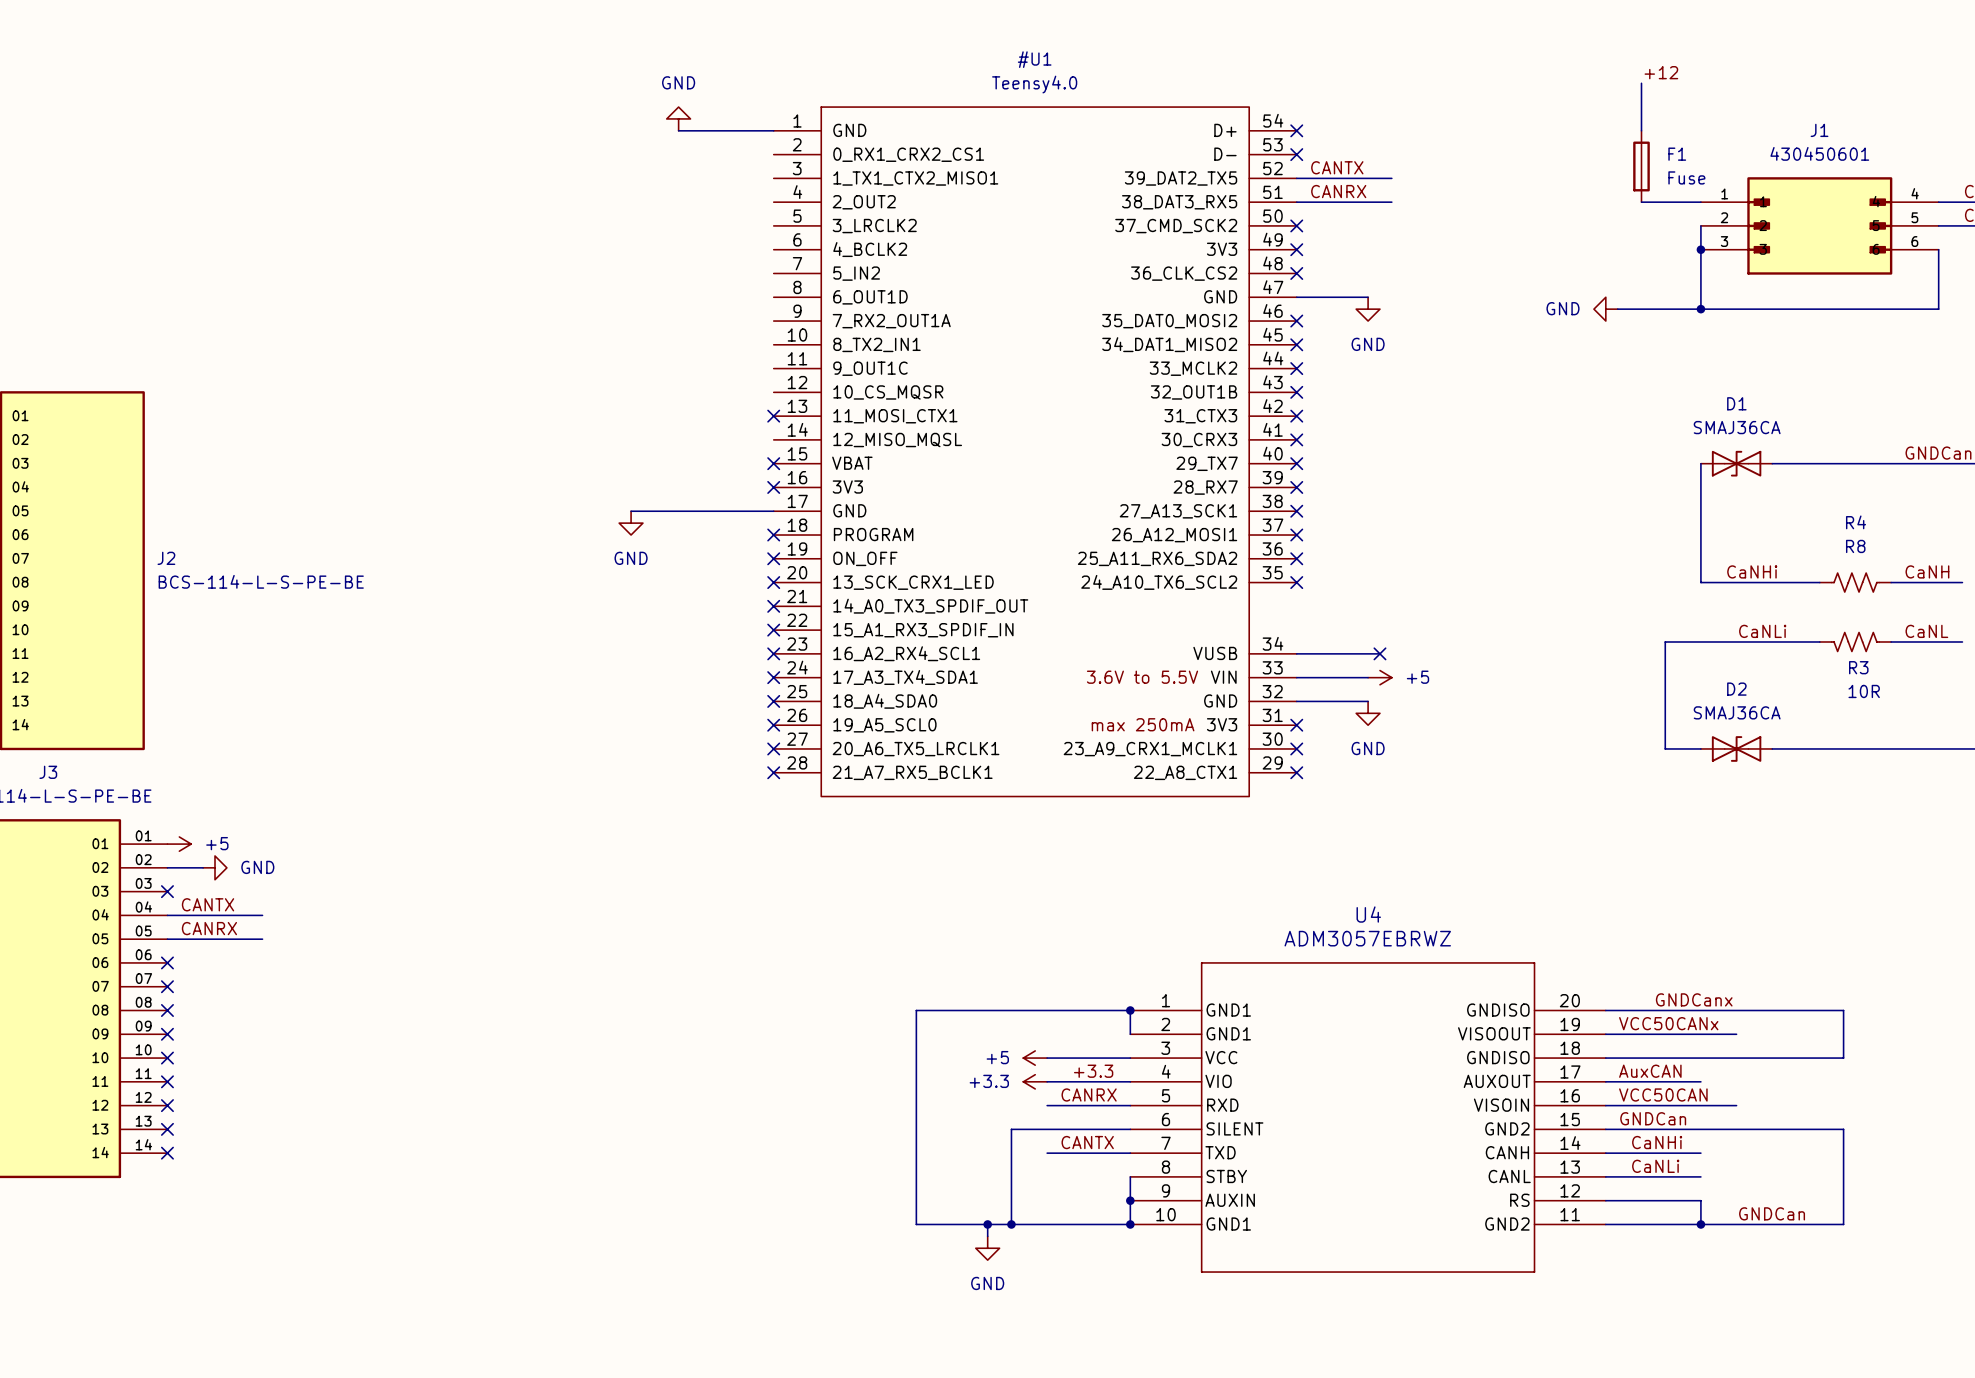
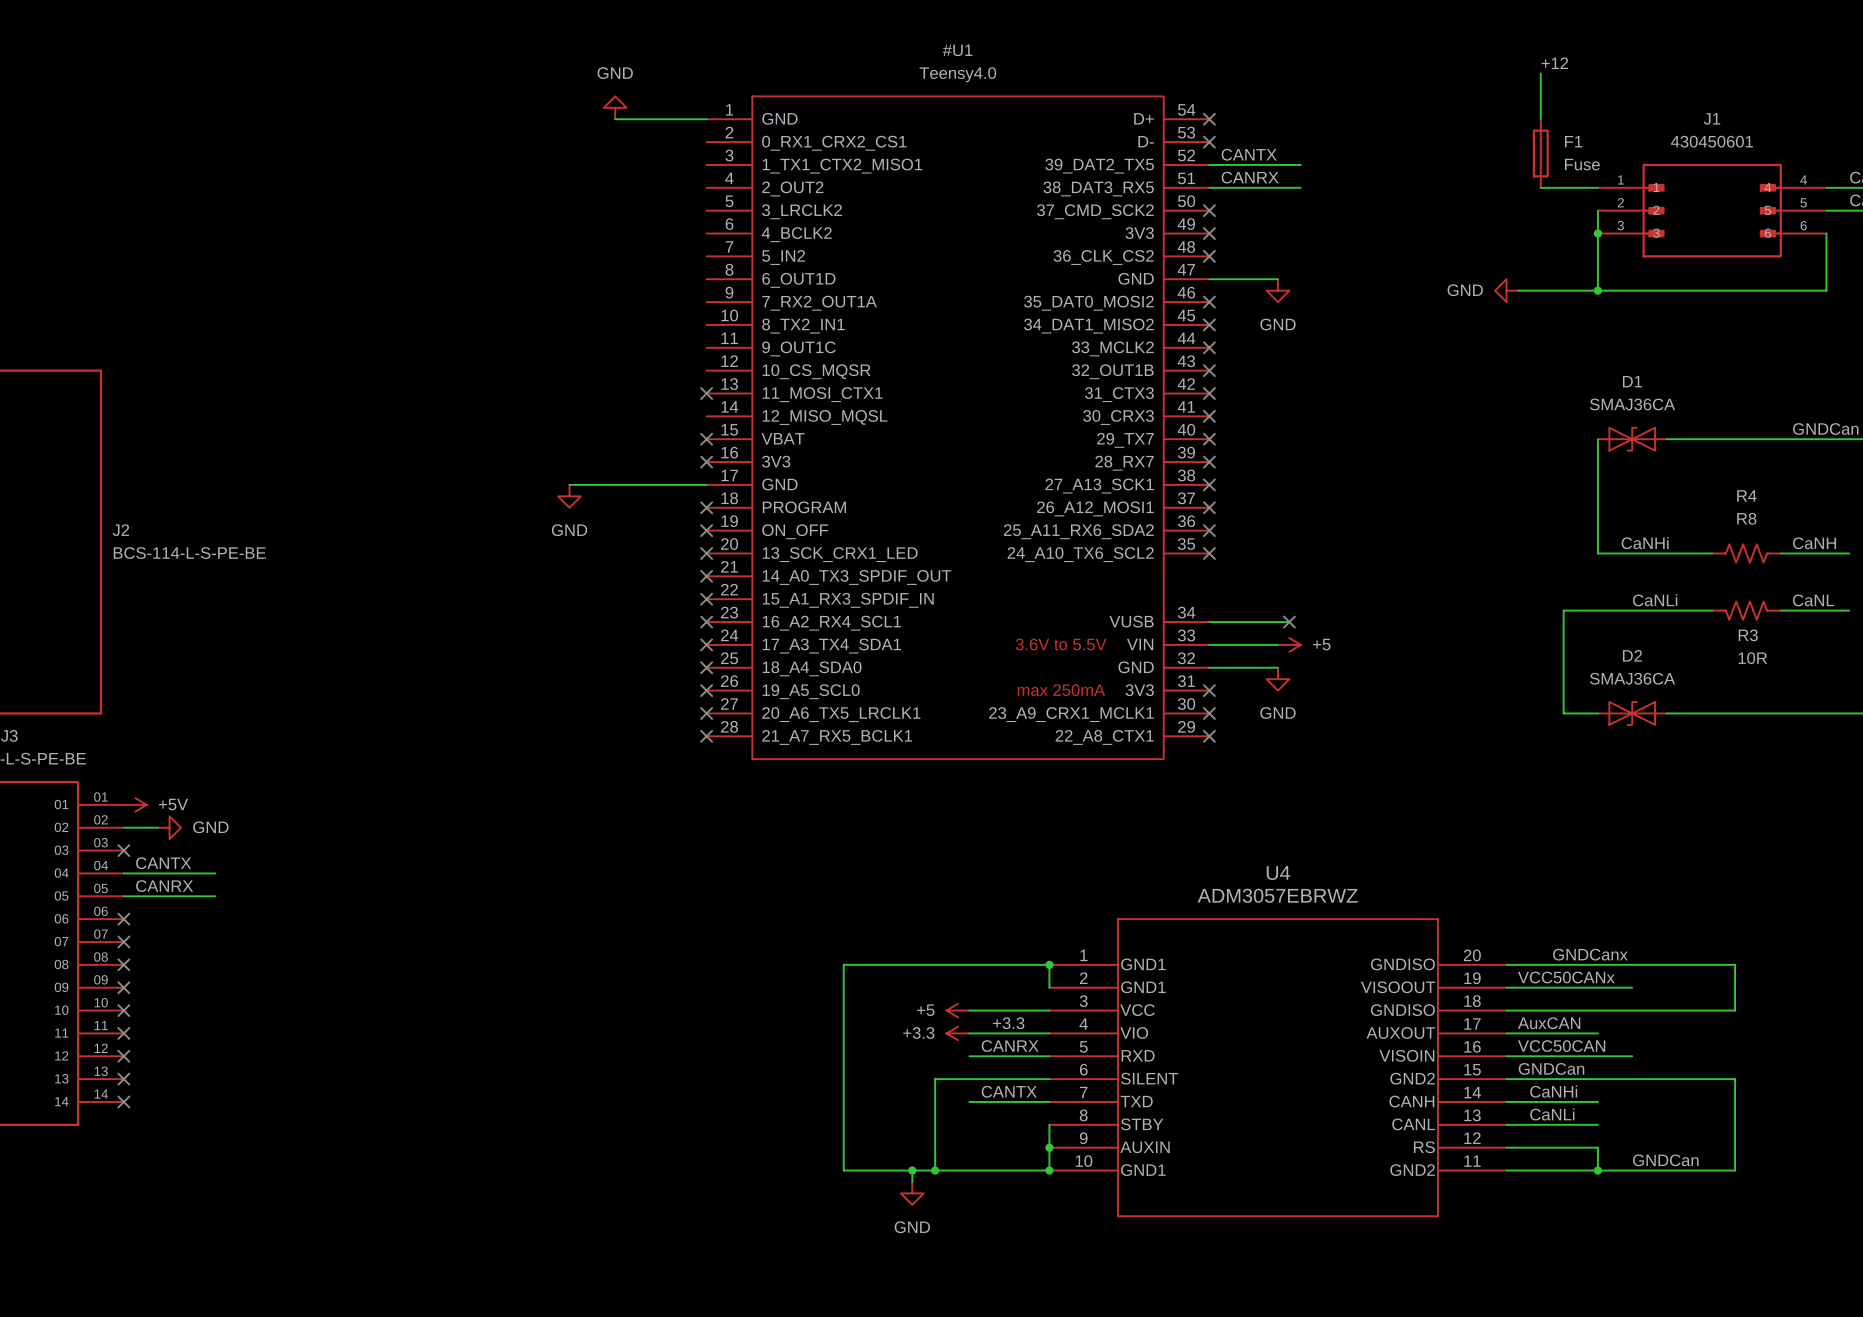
power symbol: +5 (179, 844) -> +5V (135, 804)

